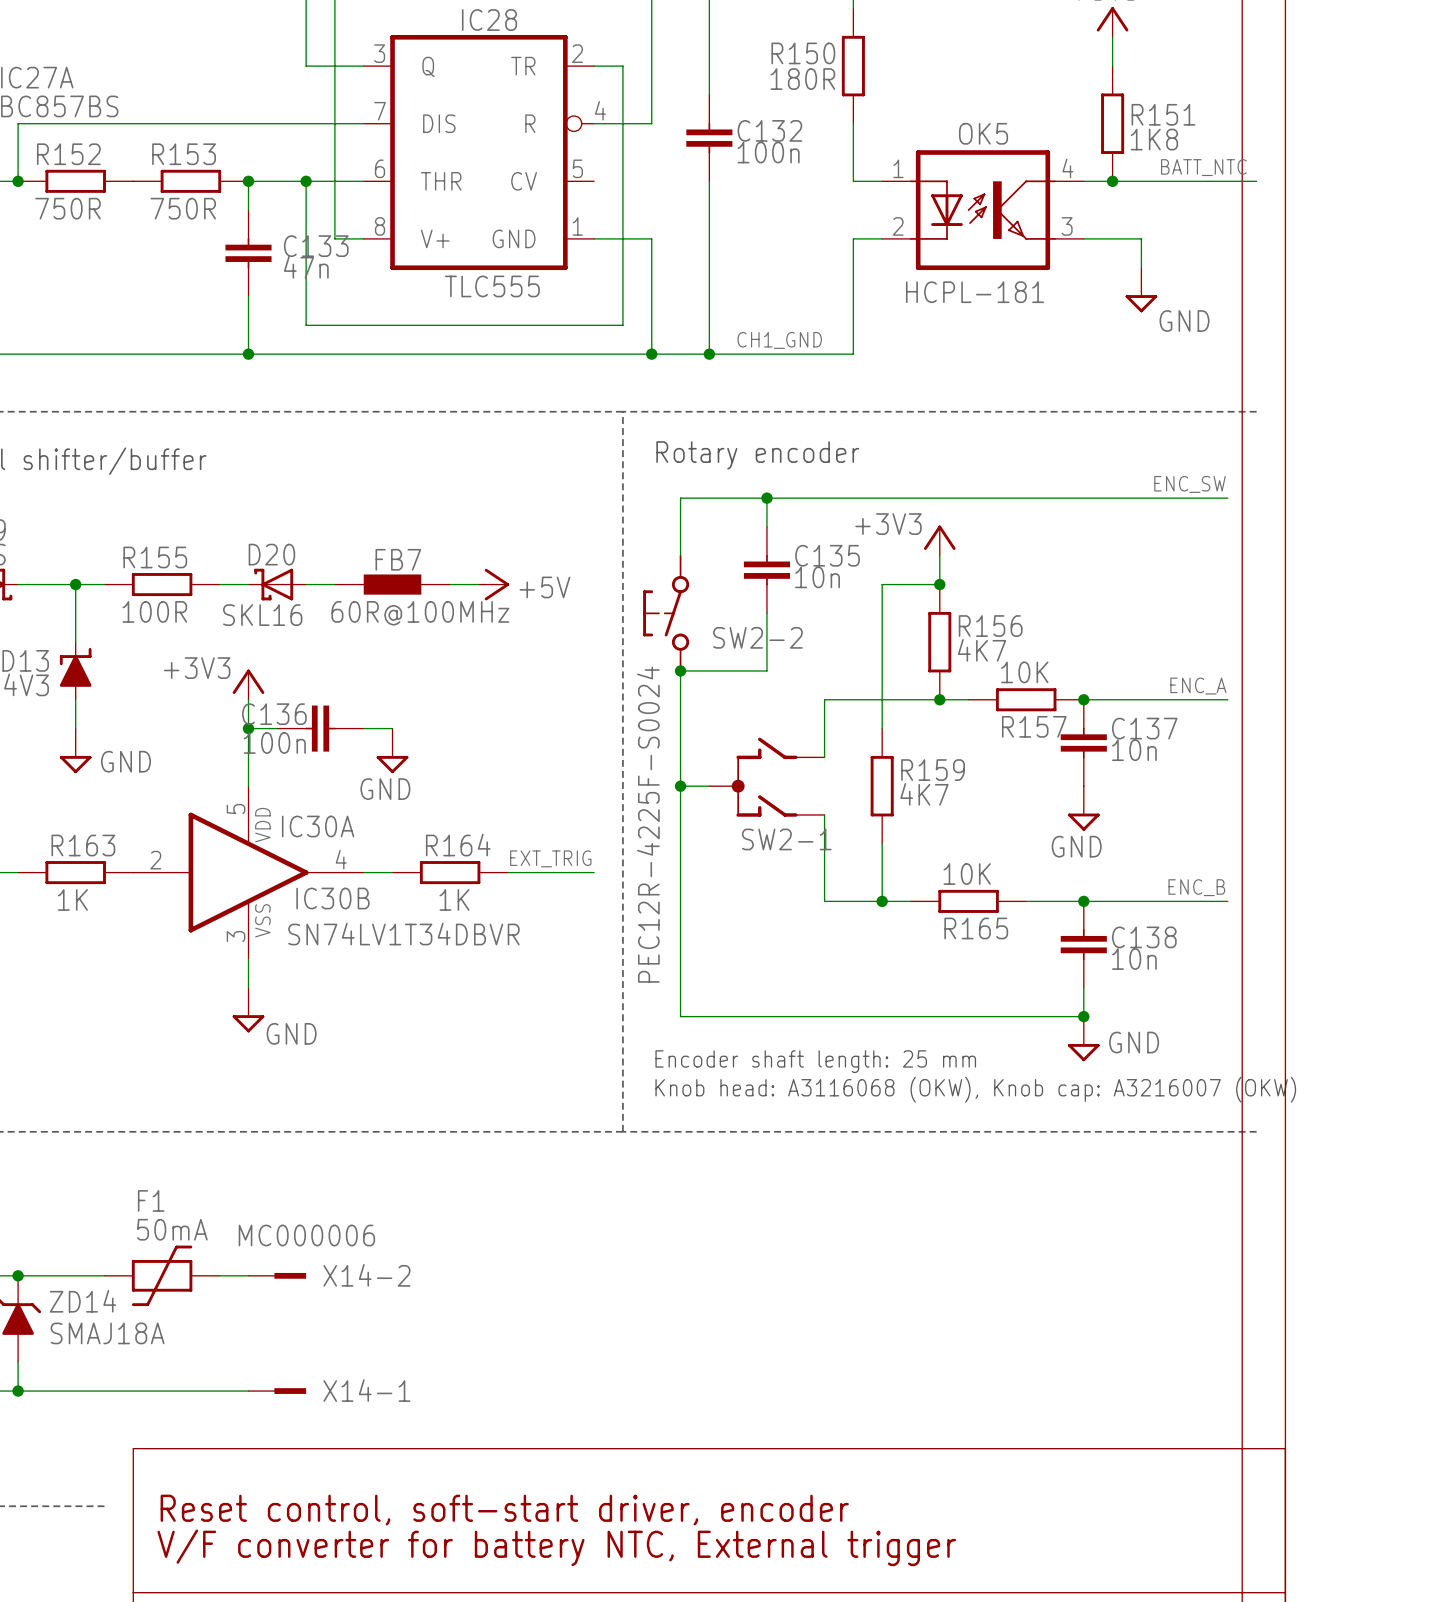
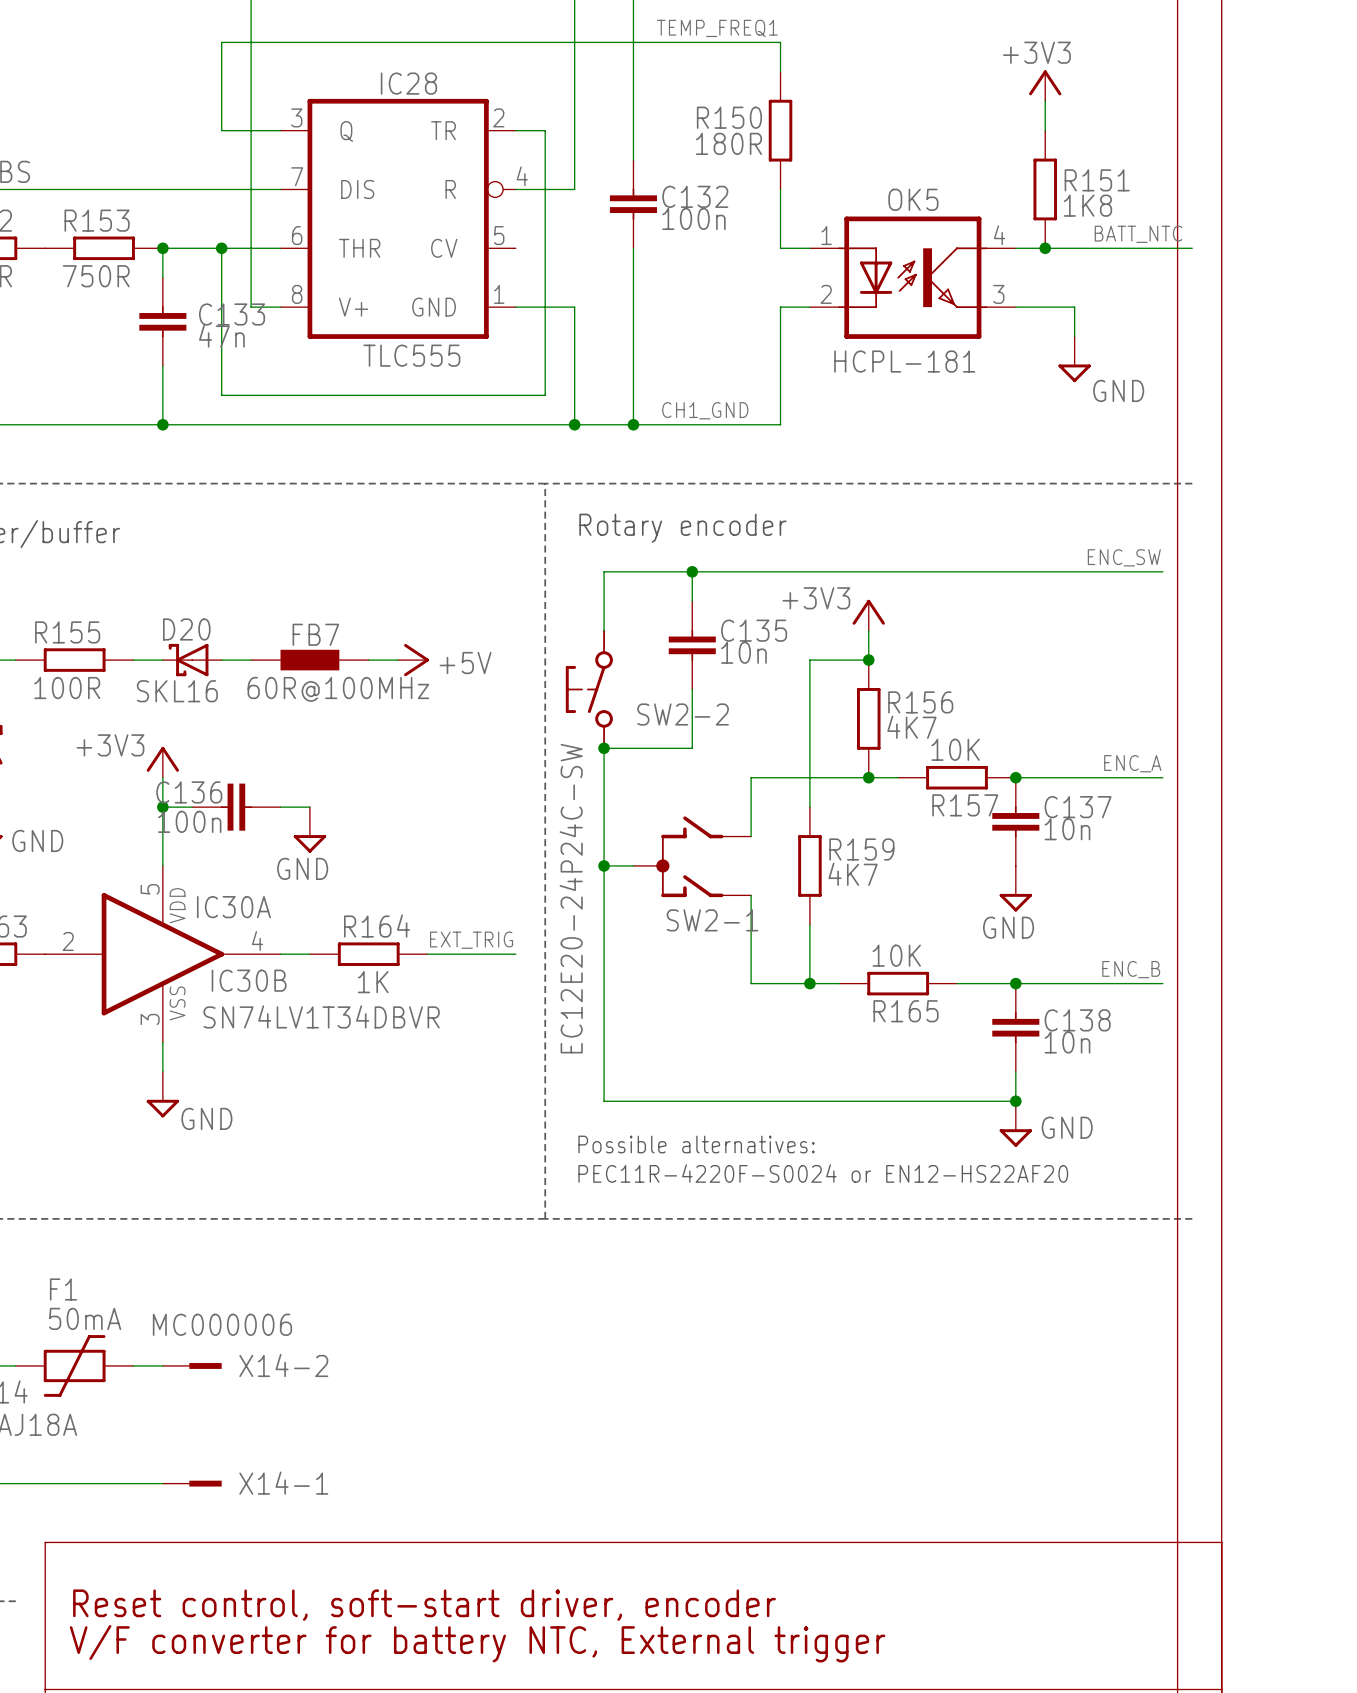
SW2-2 value: PEC12R-4225F-S0024 (648, 824) -> EC12E20-24P24C-SW (571, 898)
text: Encoder shaft length: 25 mm (815, 1061) -> Possible alternatives: (696, 1144)
text: Knob head: A3116068 (OKW), Knob cap: A3216007 (OKW) (975, 1089) -> PEC11R-4220F-S0024 or EN12-HS22AF20 (823, 1173)

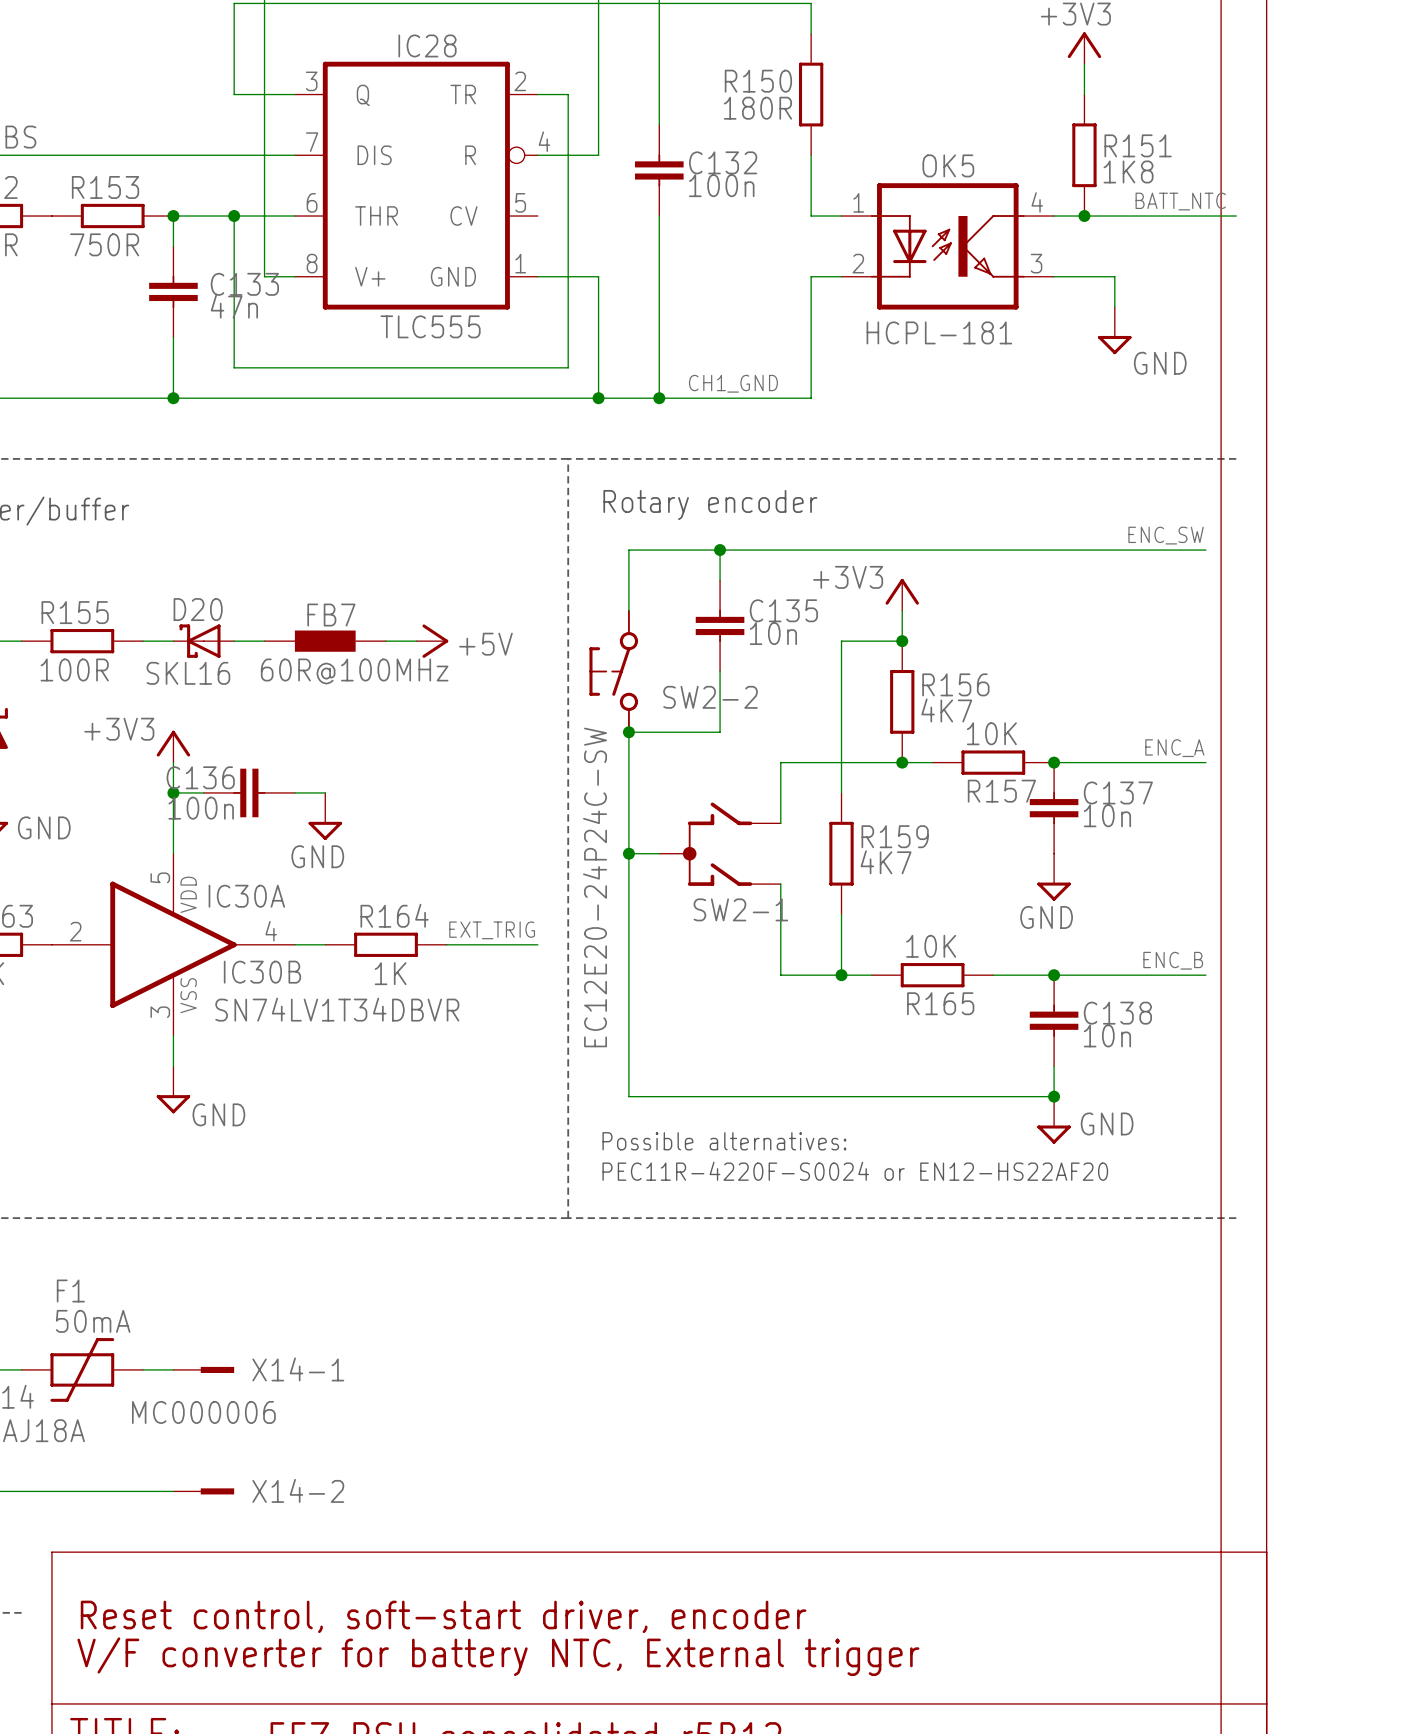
X14-1 value: MC000006 (222, 1324) -> none
X14-2 name: X14-2 (283, 1365) -> X14-1 (298, 1369)
X14-2 value: none -> MC000006 (203, 1412)
X14-1 name: X14-1 (283, 1483) -> X14-2 (298, 1490)

